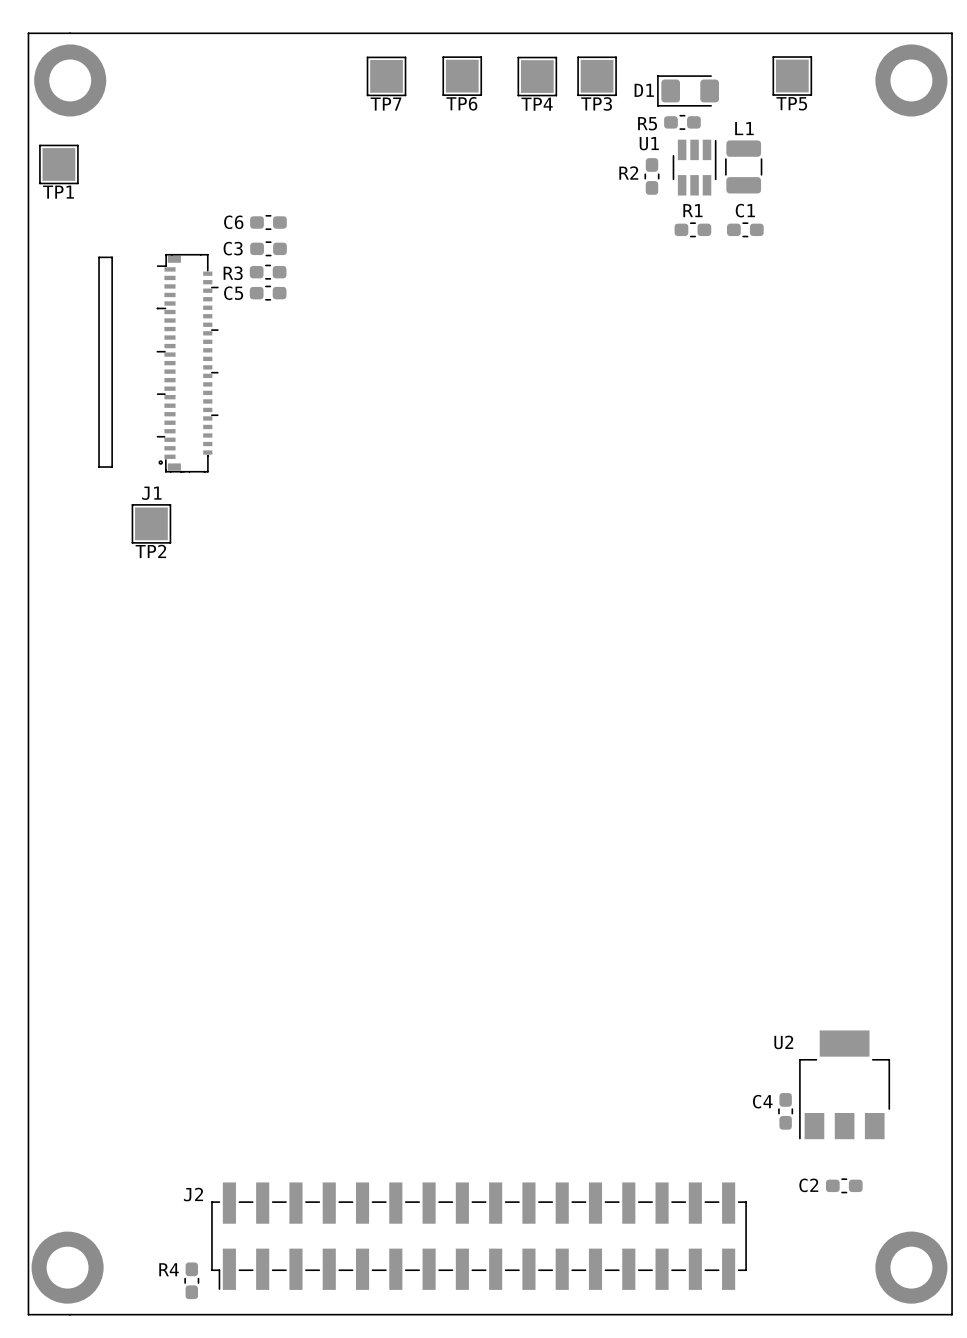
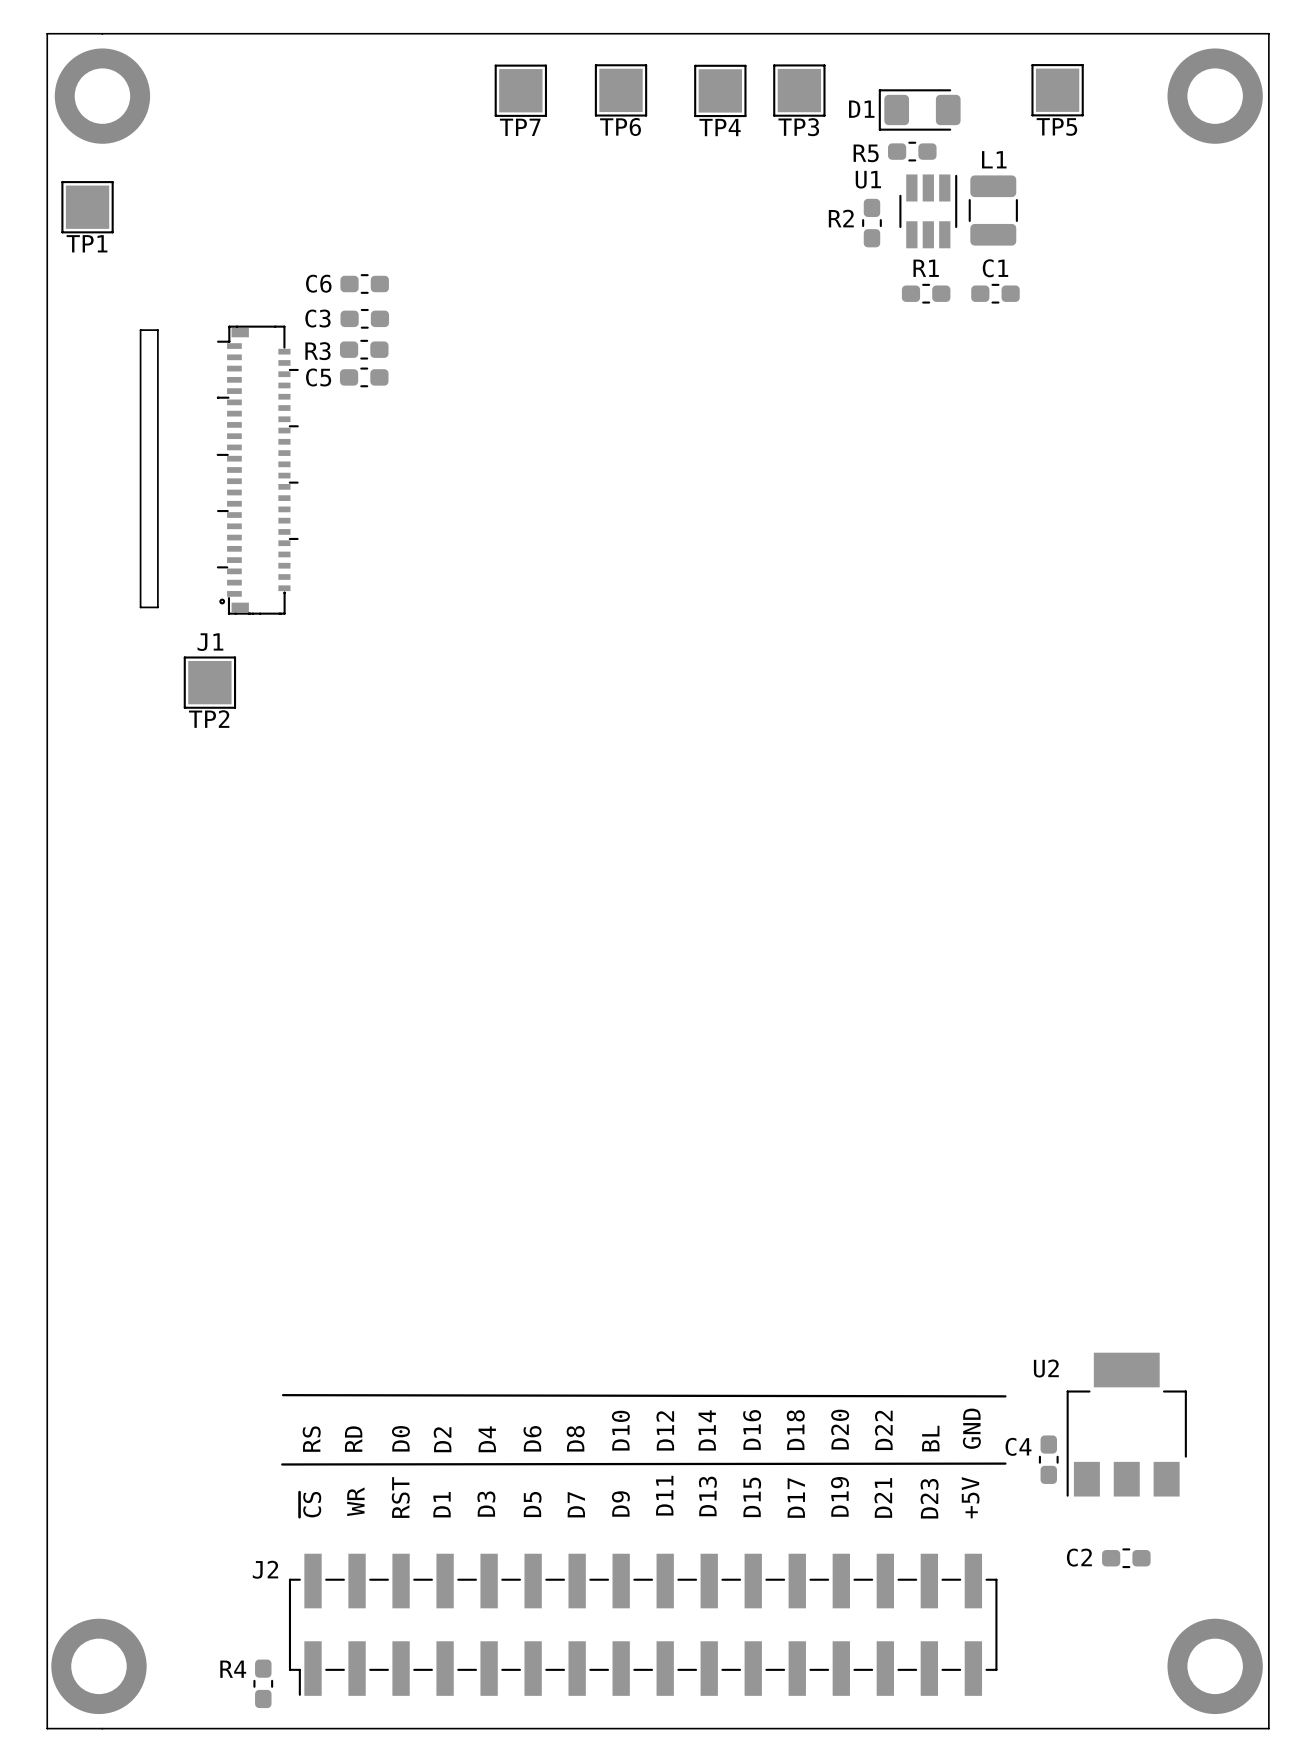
line: none -> (283, 1395) (1005, 1396)
text: none -> GND (971, 1428)
text: none -> D16 (752, 1429)
text: none -> D18 (795, 1430)
text: none -> D20 (840, 1429)
text: none -> D10 (620, 1430)
text: none -> D12 (665, 1430)
text: none -> D14 (707, 1430)
text: none -> D22 (883, 1430)
text: none -> RS (311, 1439)
text: none -> RD (353, 1439)
text: none -> D0 (400, 1438)
text: none -> D4 (487, 1439)
text: none -> D6 (532, 1438)
text: none -> D8 (575, 1438)
text: none -> BL (930, 1438)
text: none -> D2 (442, 1439)
line: none -> (1005, 1463) (282, 1464)
text: none -> D11 (664, 1495)
text: none -> RST (400, 1497)
text: none -> D13 (707, 1496)
text: none -> D15 (752, 1497)
text: none -> D19 (839, 1496)
text: none -> D17 (796, 1498)
text: none -> D21 (883, 1497)
text: none -> D23 (929, 1498)
text: none -> +5V (970, 1497)
text: none -> WR (355, 1501)
text: none -> D3 (486, 1504)
text: none -> D9 (620, 1504)
text: none -> ~{CS} (310, 1504)
text: none -> D1 (442, 1504)
text: none -> D5 (532, 1504)
text: none -> D7 (576, 1504)

